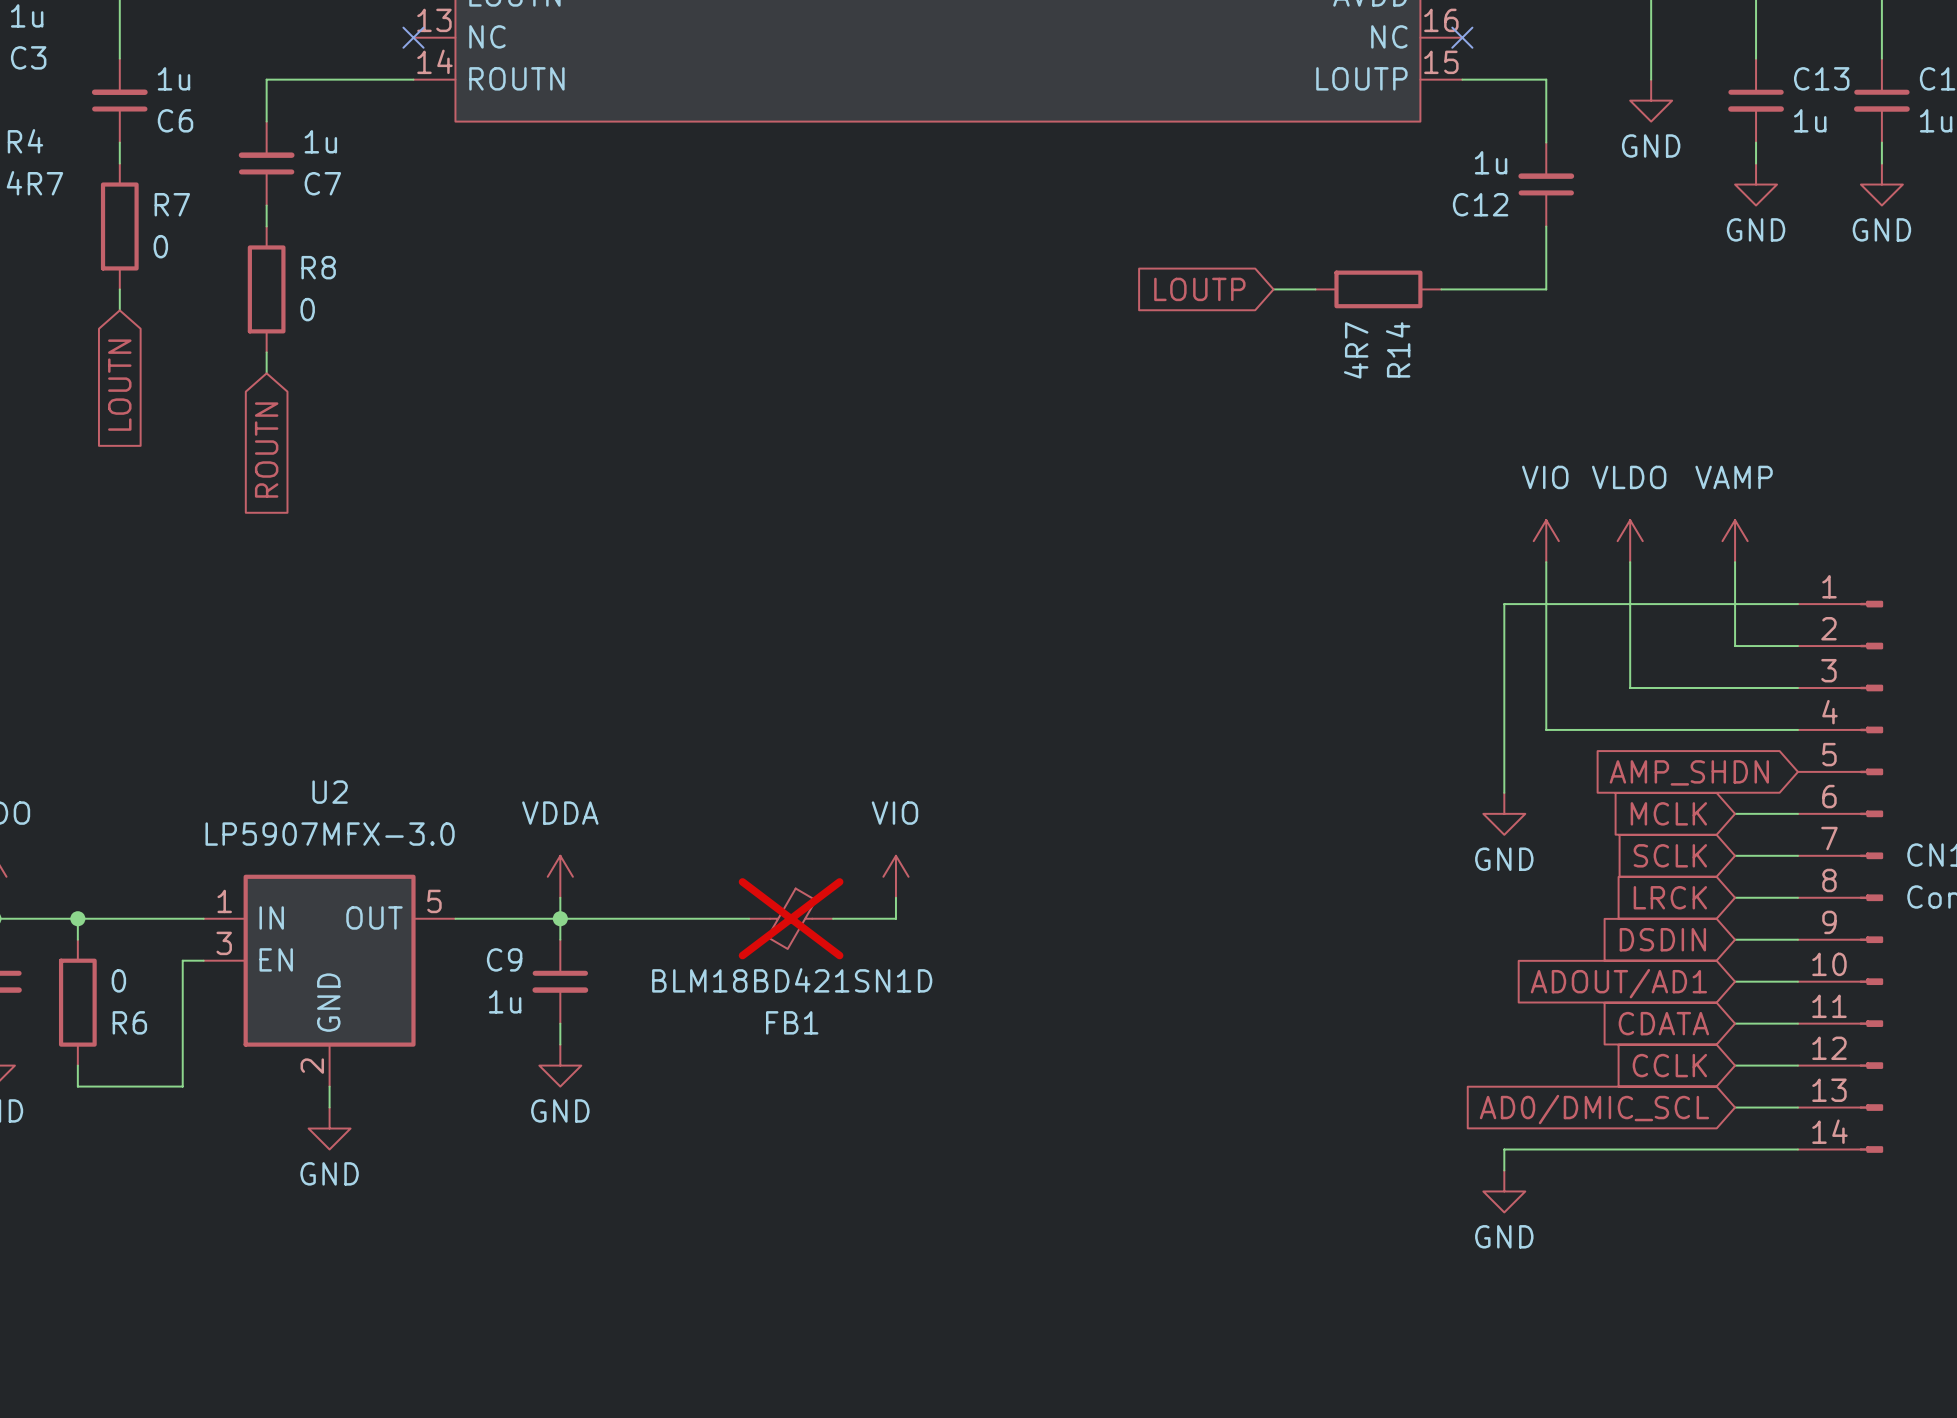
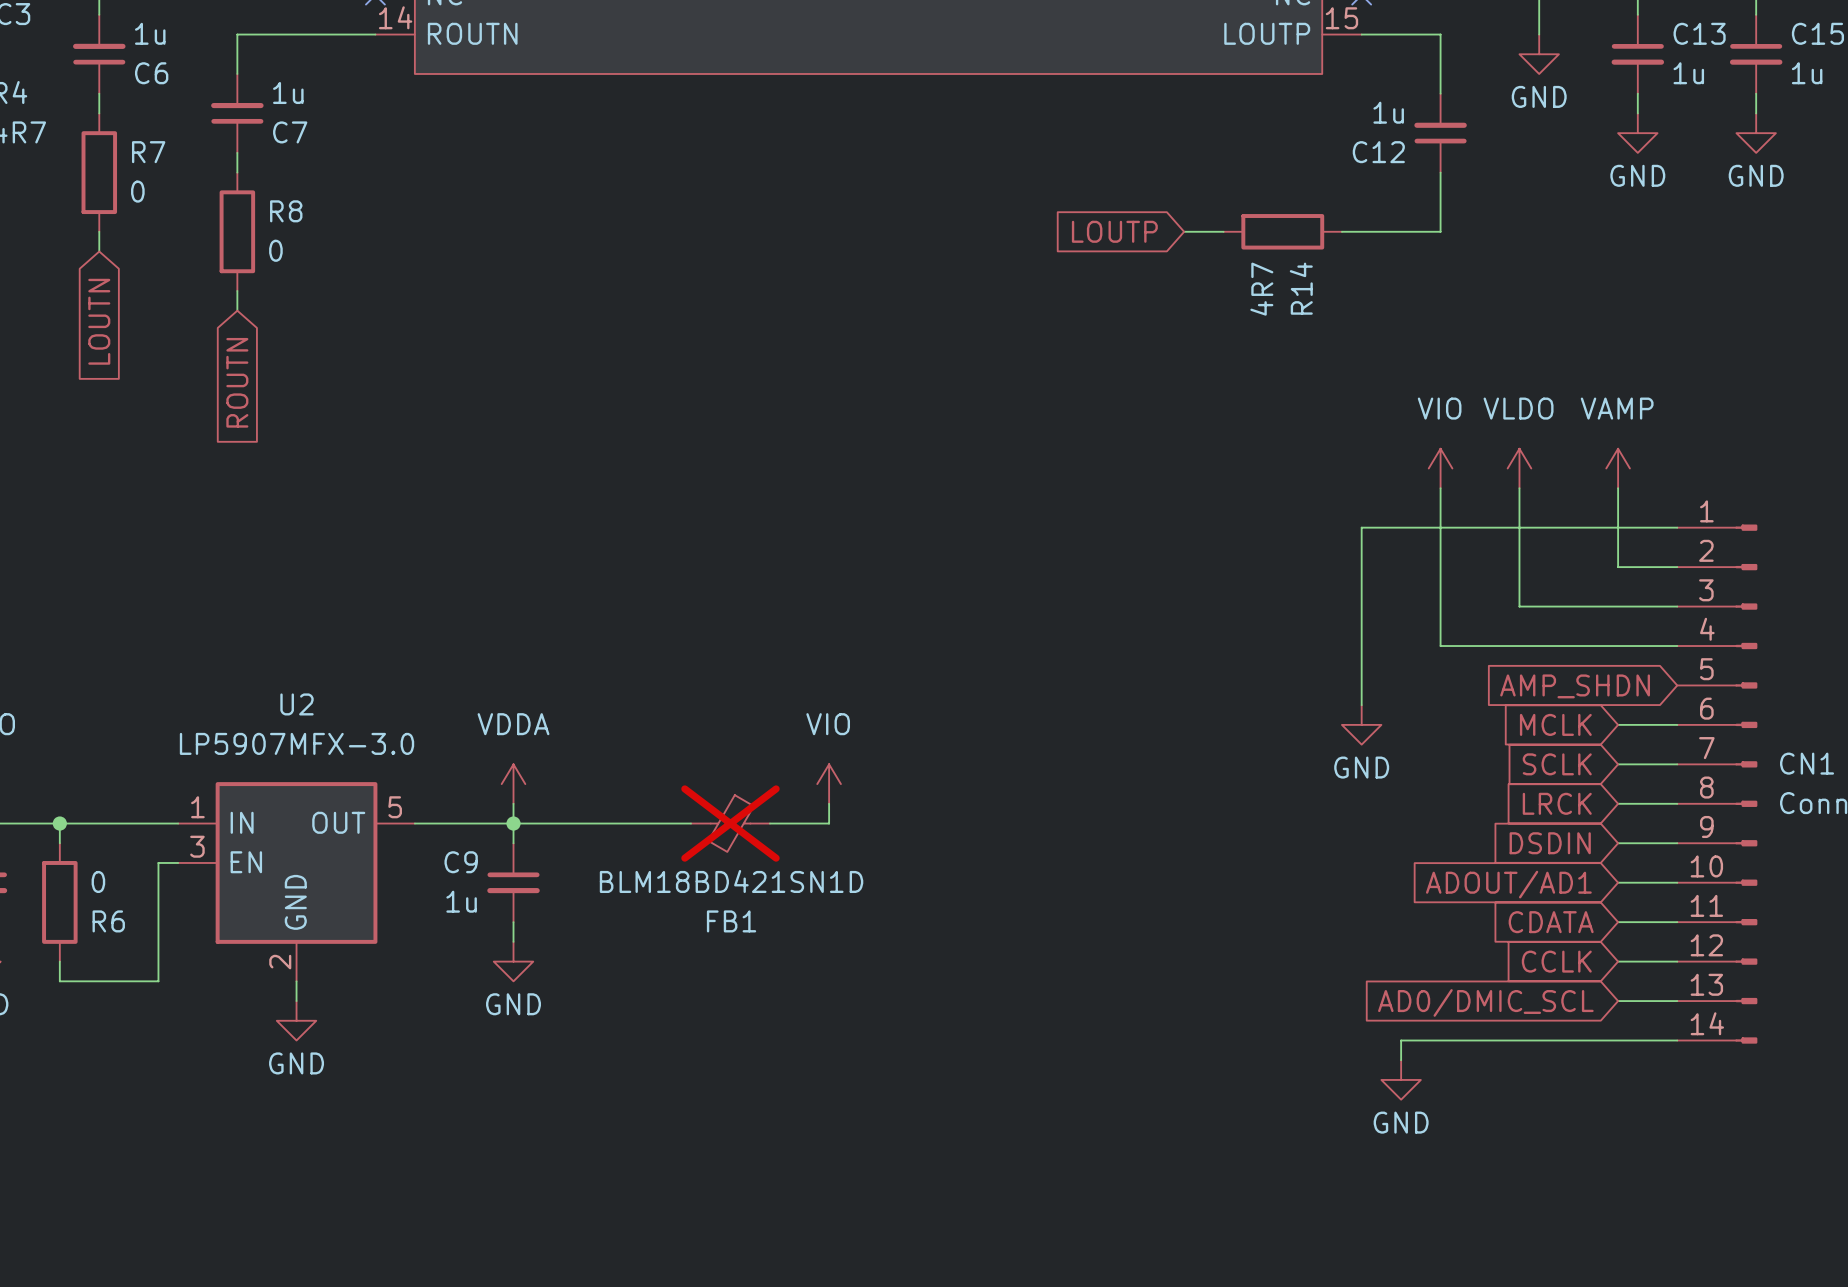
wire: (1504, 604) (1504, 792) -> (1401, 527) (1361, 527) (1361, 705)
power symbol position: GND (1504, 813) -> GND (1361, 724)

